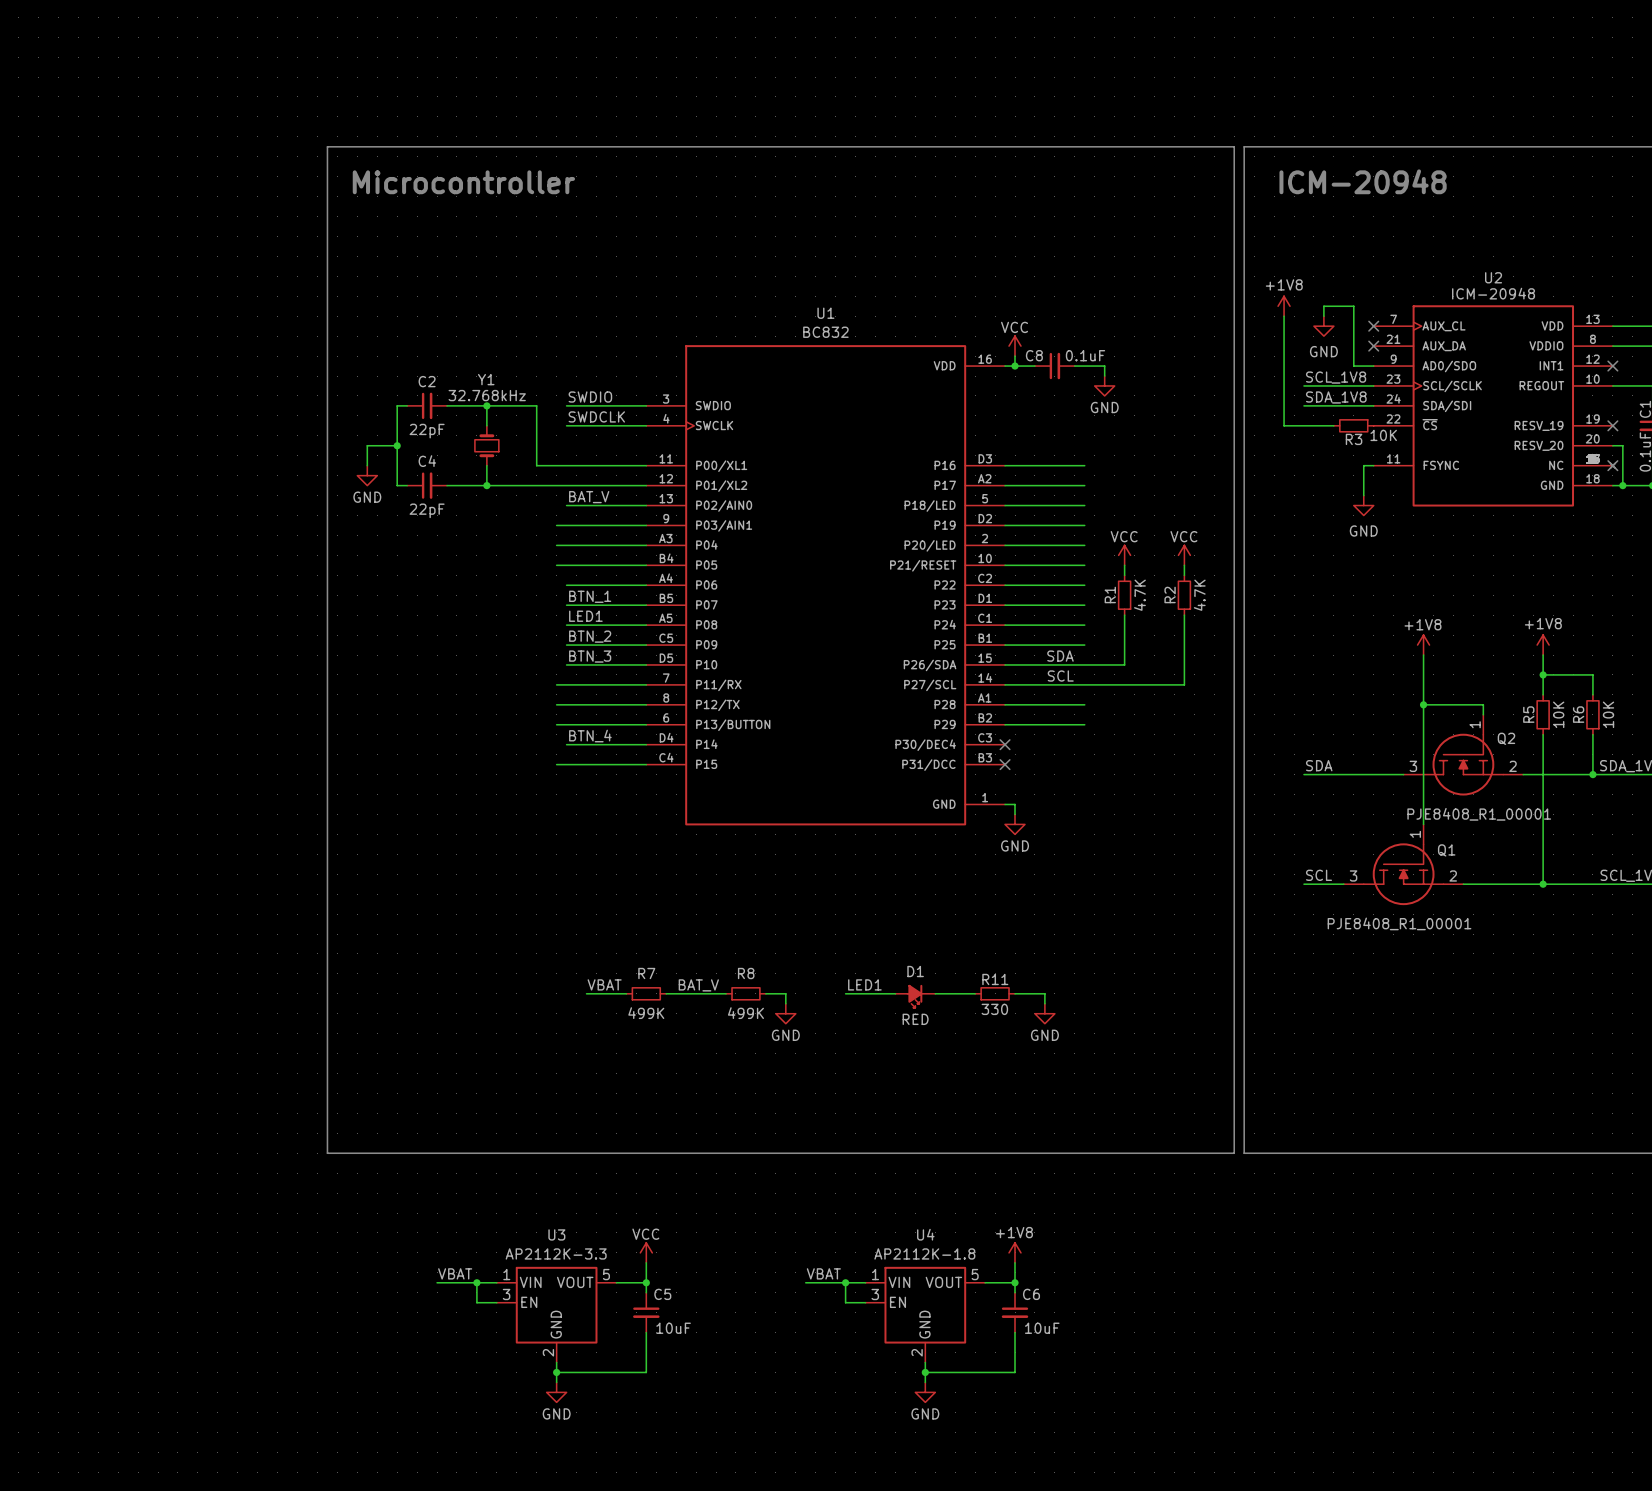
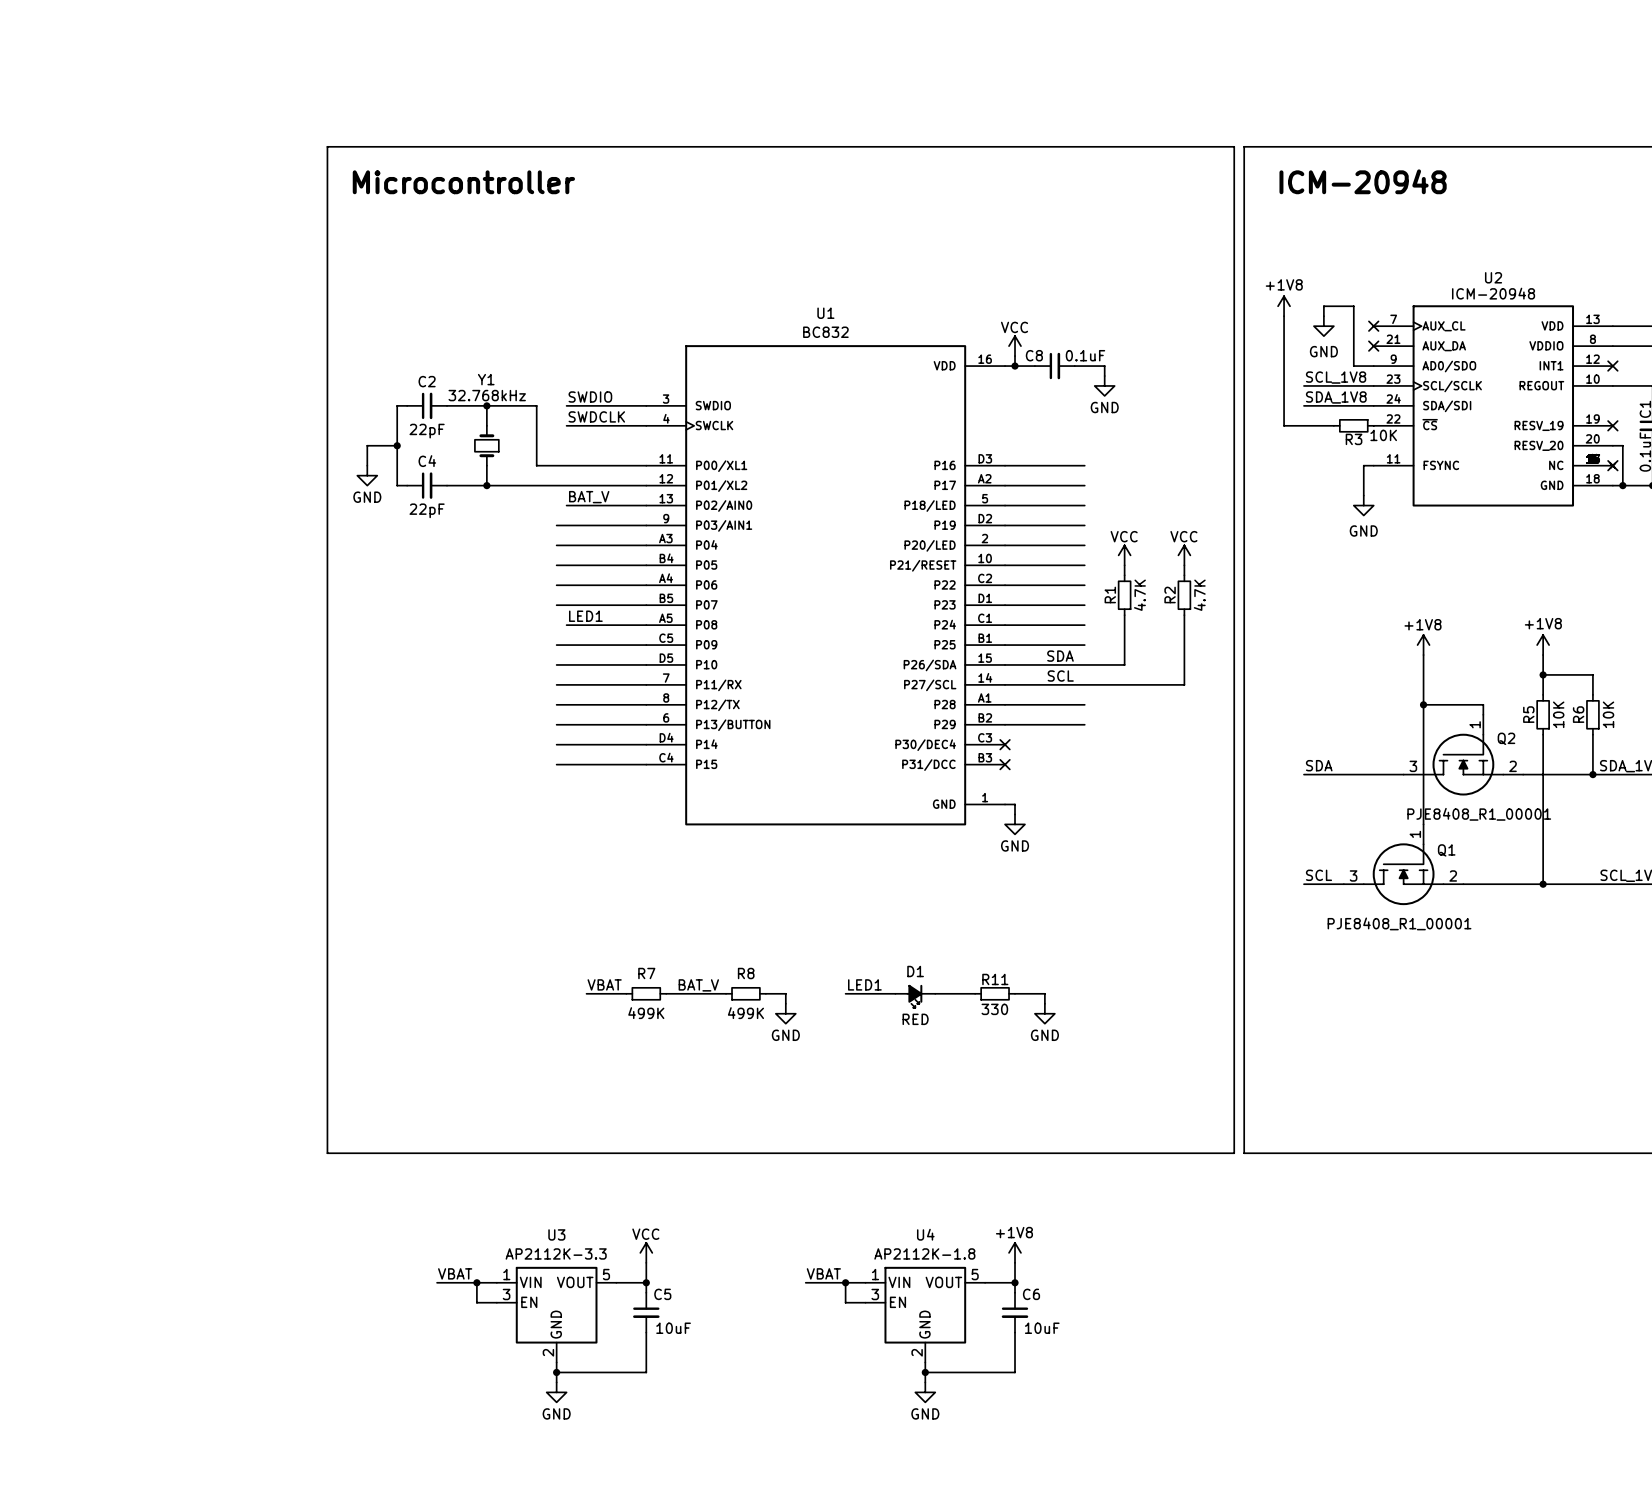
wire: none -> (556, 585) (566, 585)
label: BTN_1 (590, 596) -> none
wire: none -> (556, 605) (566, 605)
label: BTN_2 (590, 636) -> none
wire: none -> (556, 645) (566, 645)
label: BTN_3 (590, 656) -> none
wire: none -> (556, 664) (566, 664)
label: BTN_4 (590, 736) -> none
wire: none -> (556, 744) (566, 744)

